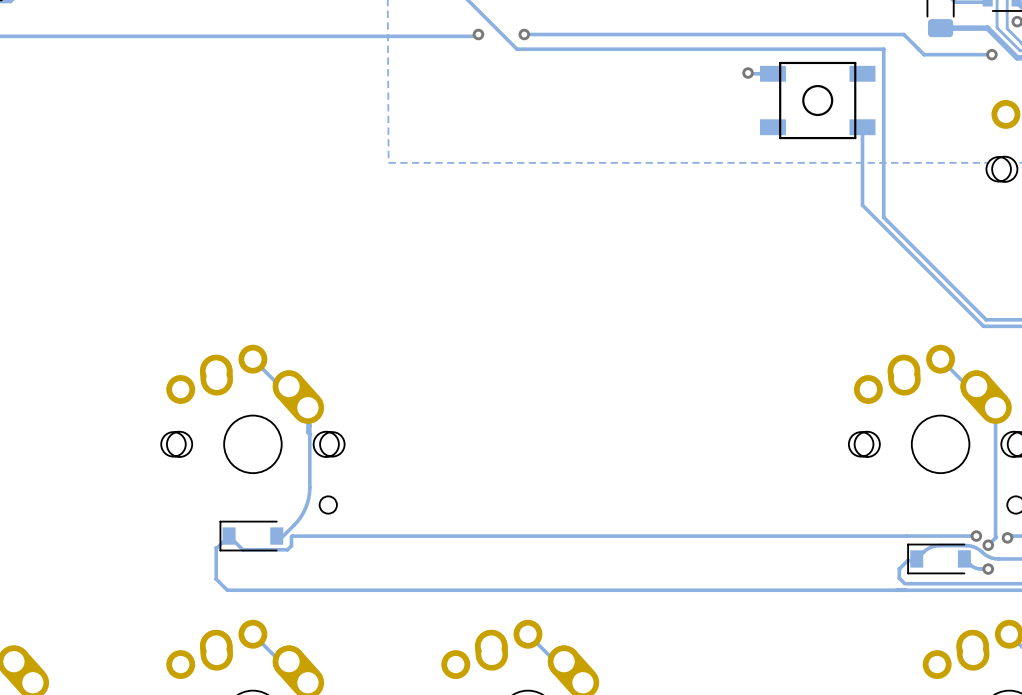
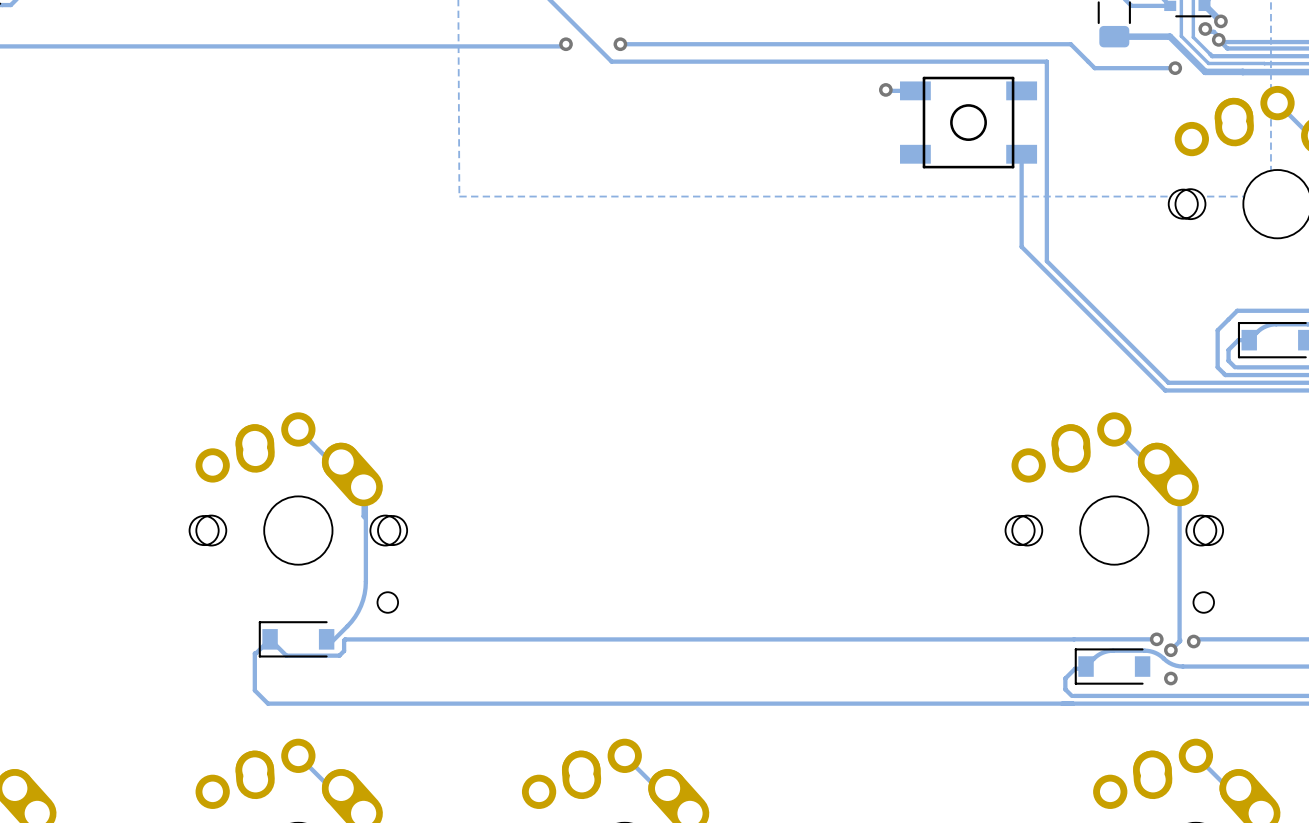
track: (964, 558) (975, 567) (988, 569) -> none

